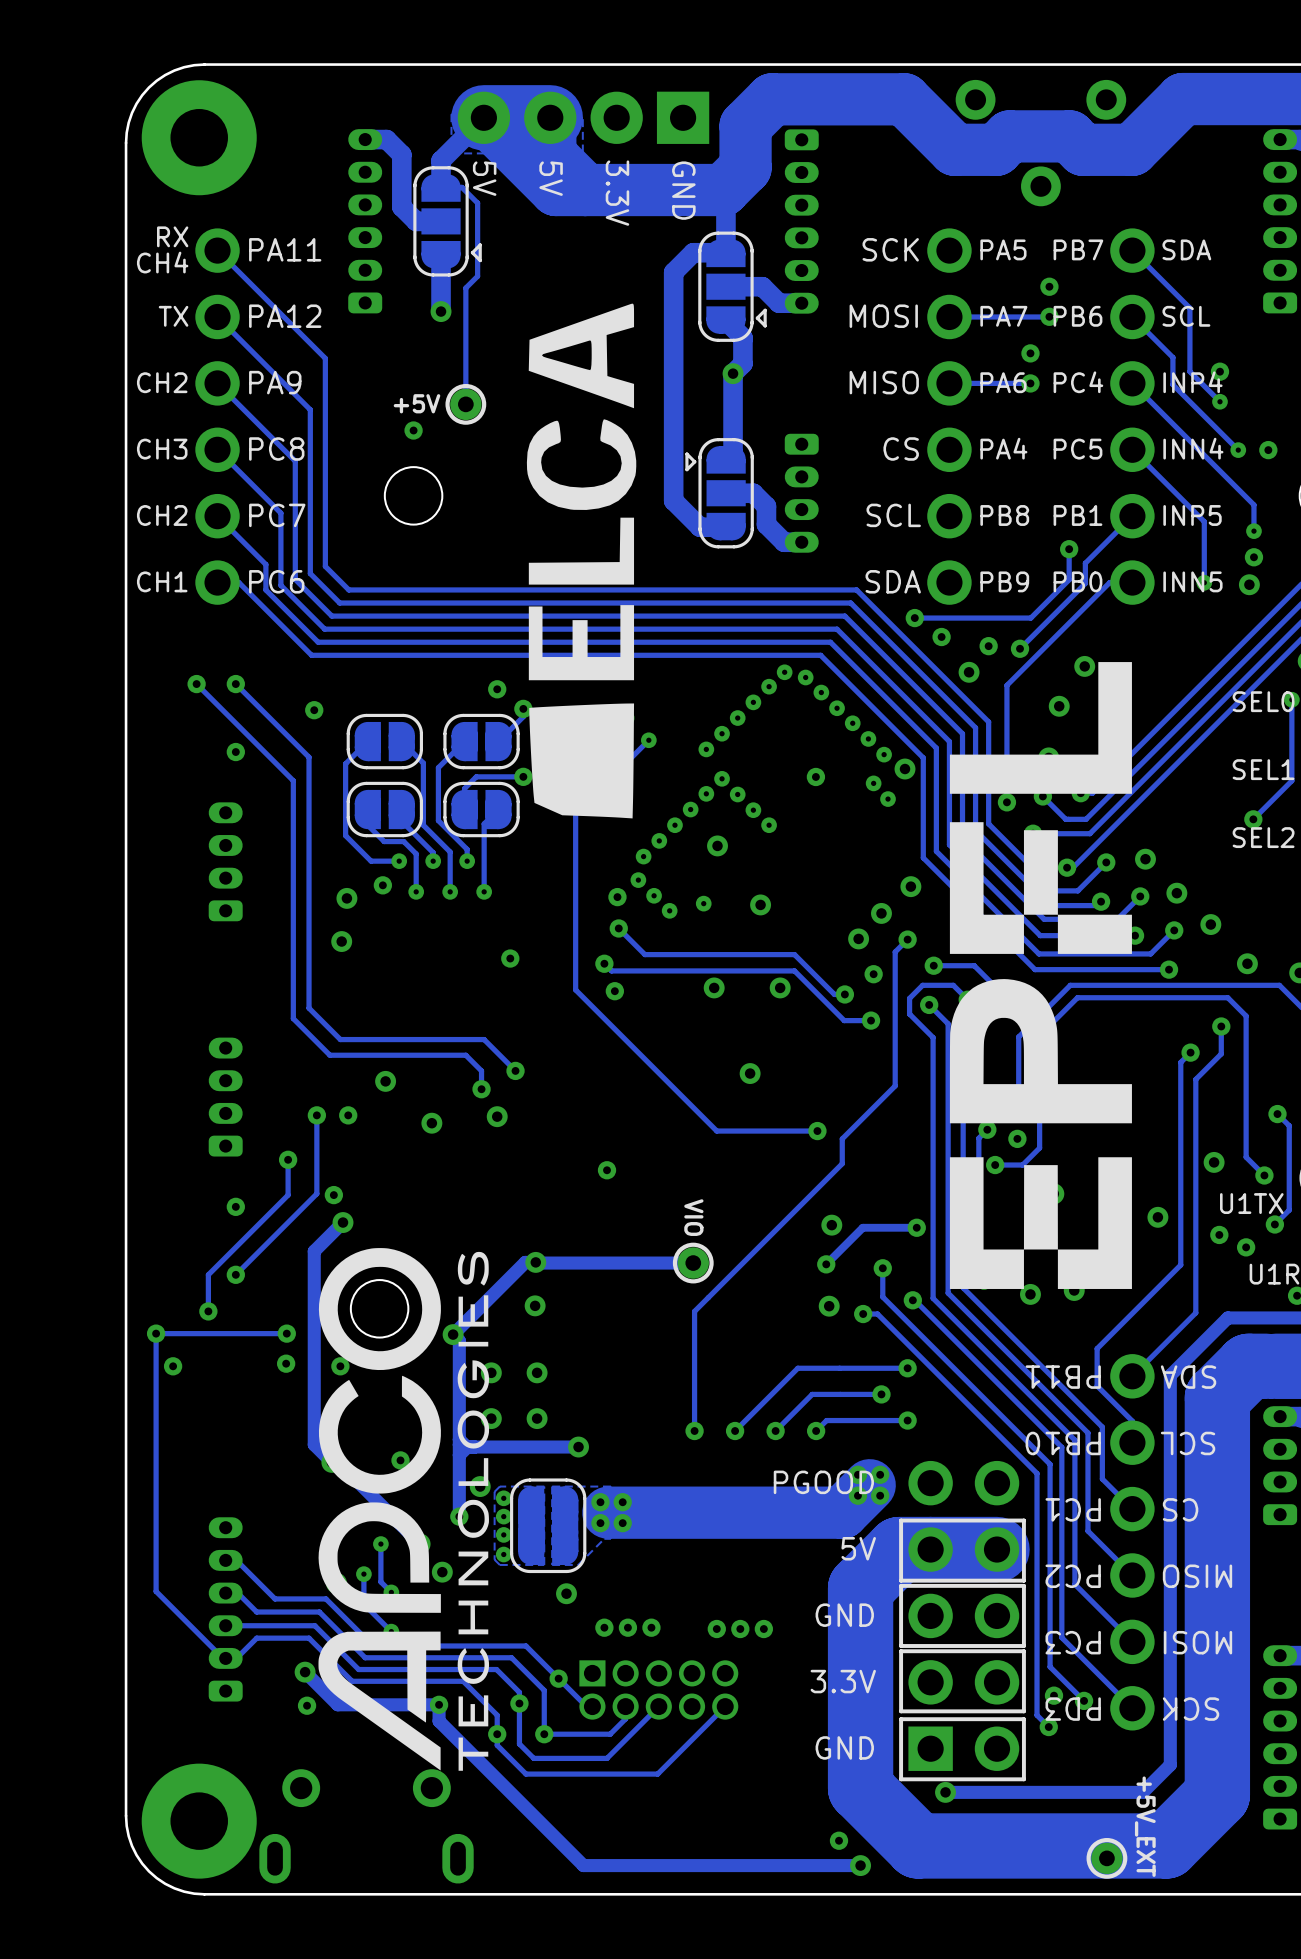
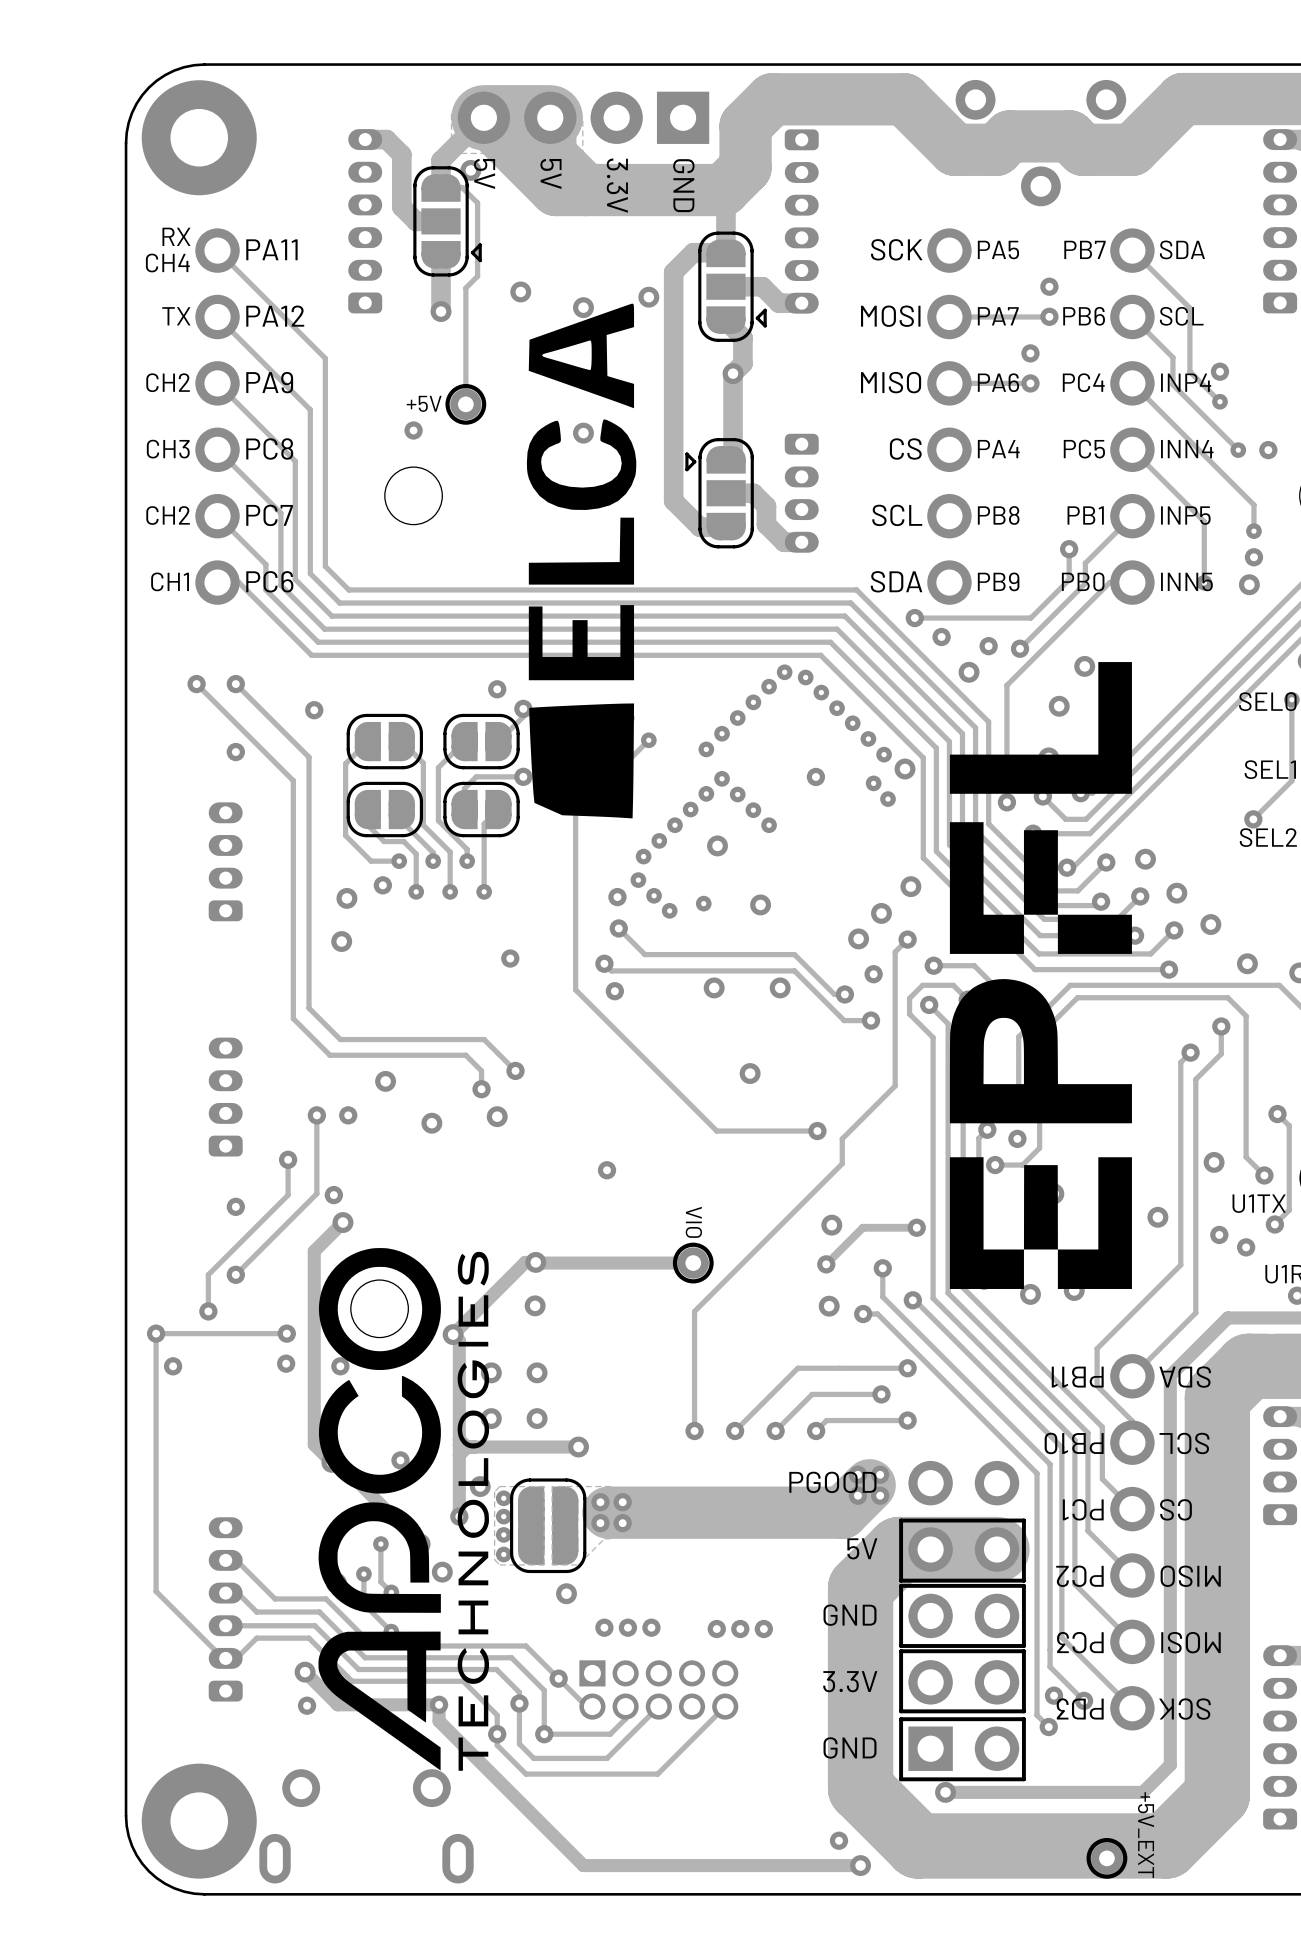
via: none -> (470, 170)
via: none -> (520, 291)
via: none -> (648, 297)
via: none -> (583, 307)
via: none -> (583, 433)

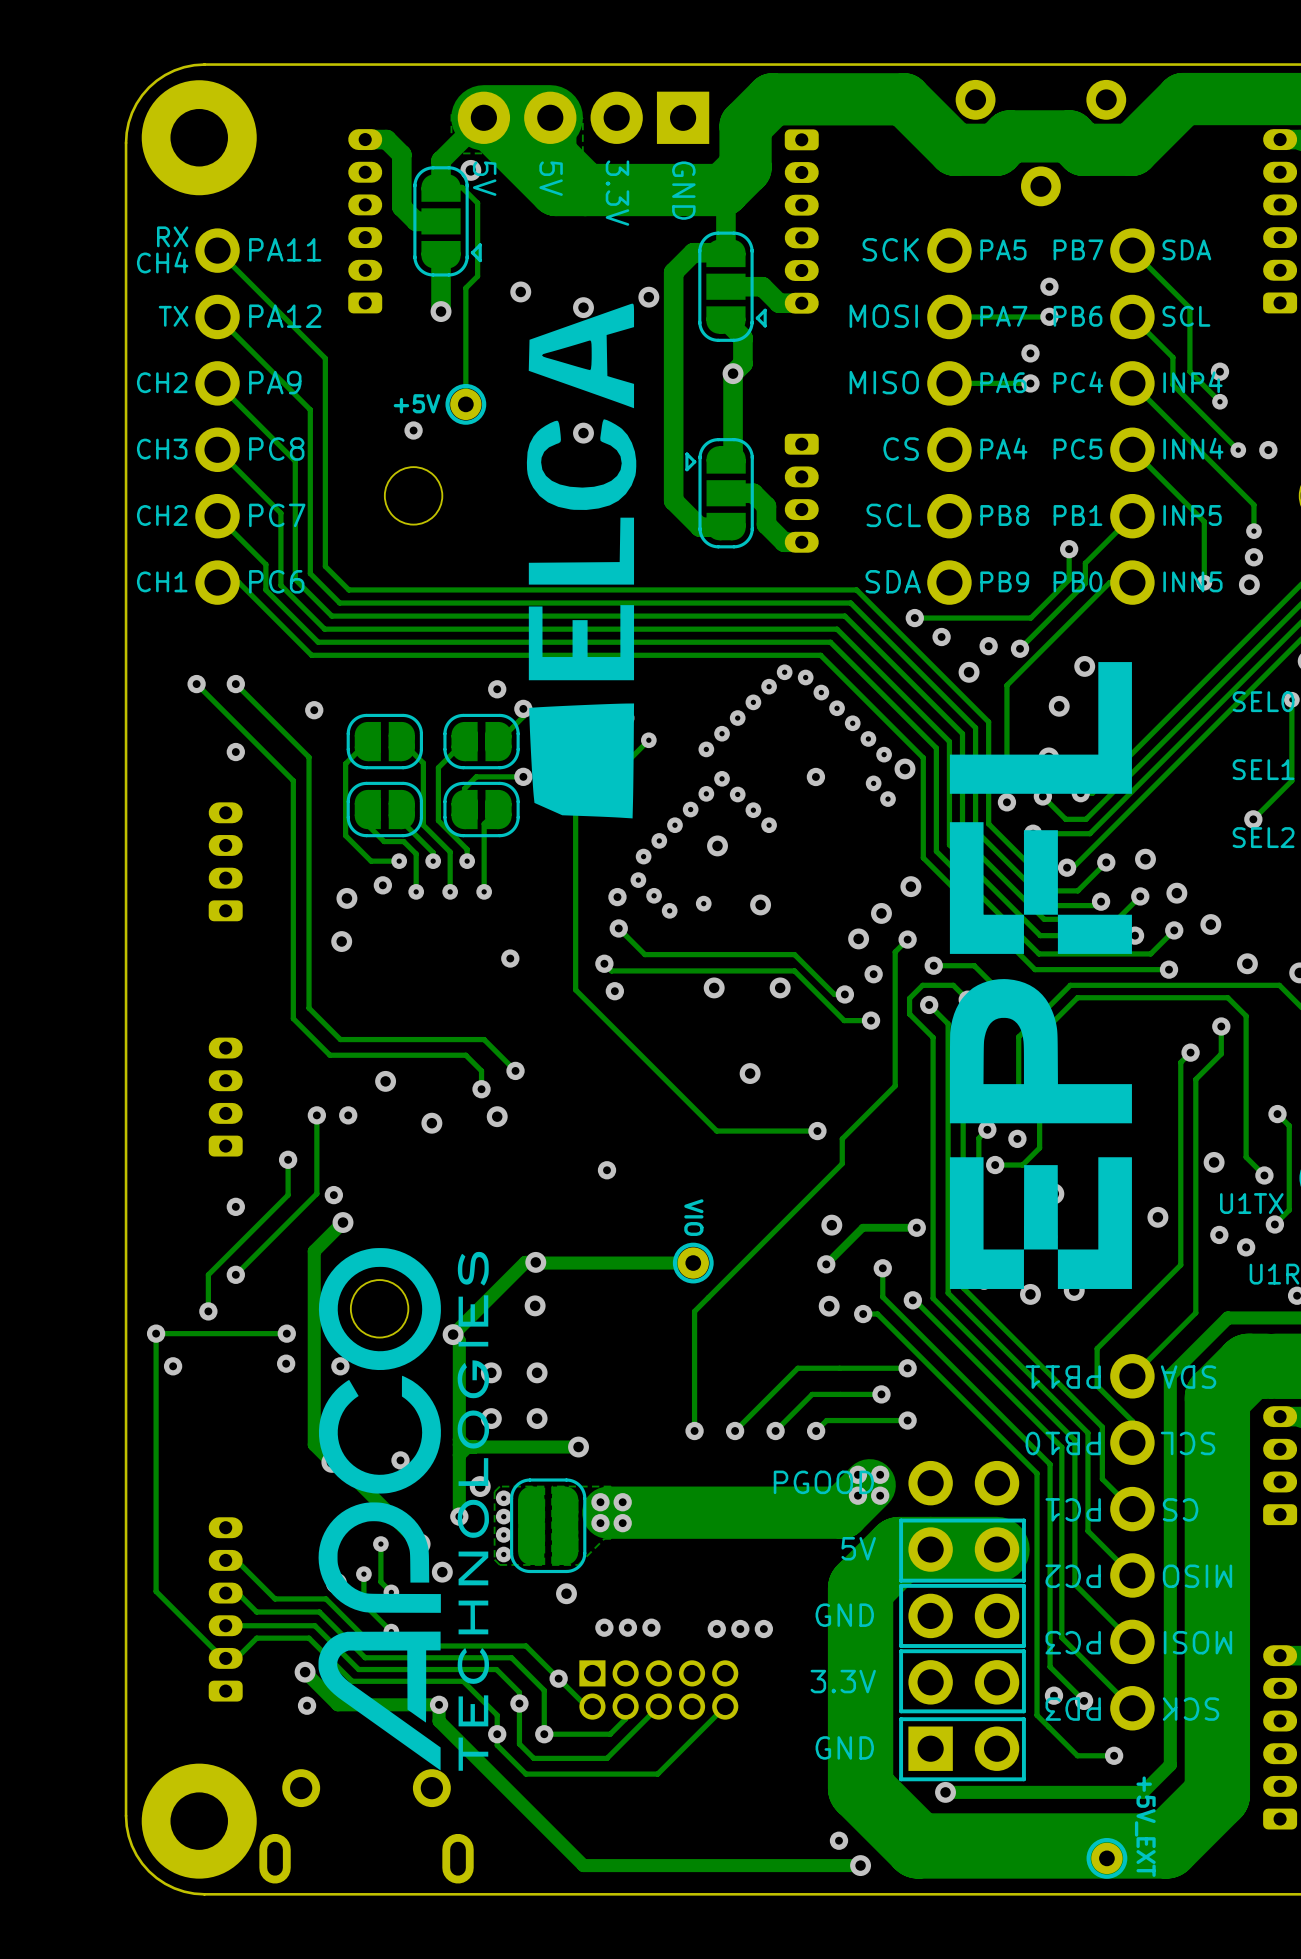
track: none -> (1048, 1727) (1077, 1755) (1114, 1755)
via position: (1048, 1727) -> (1114, 1755)

